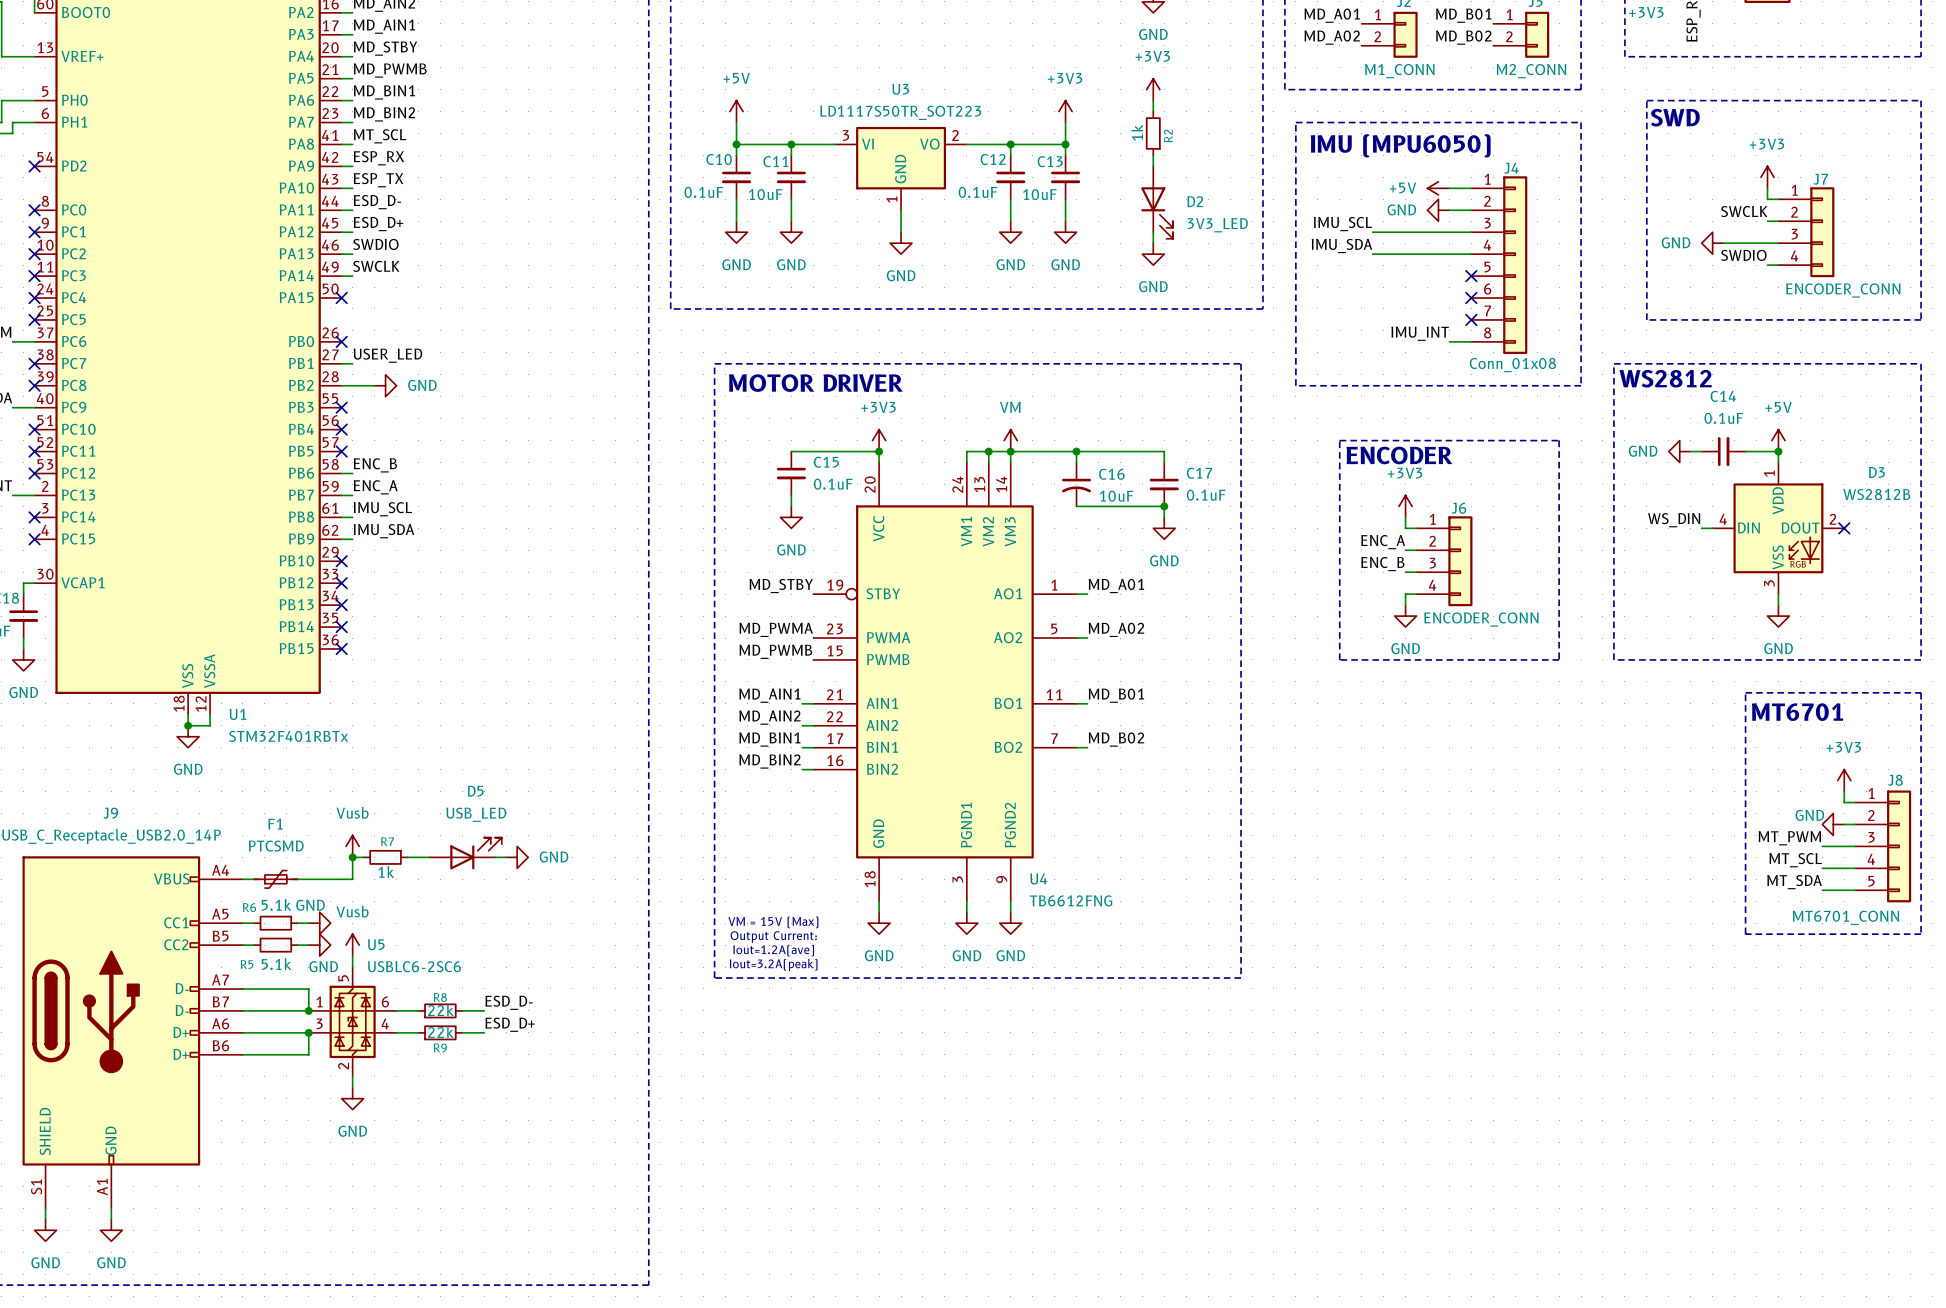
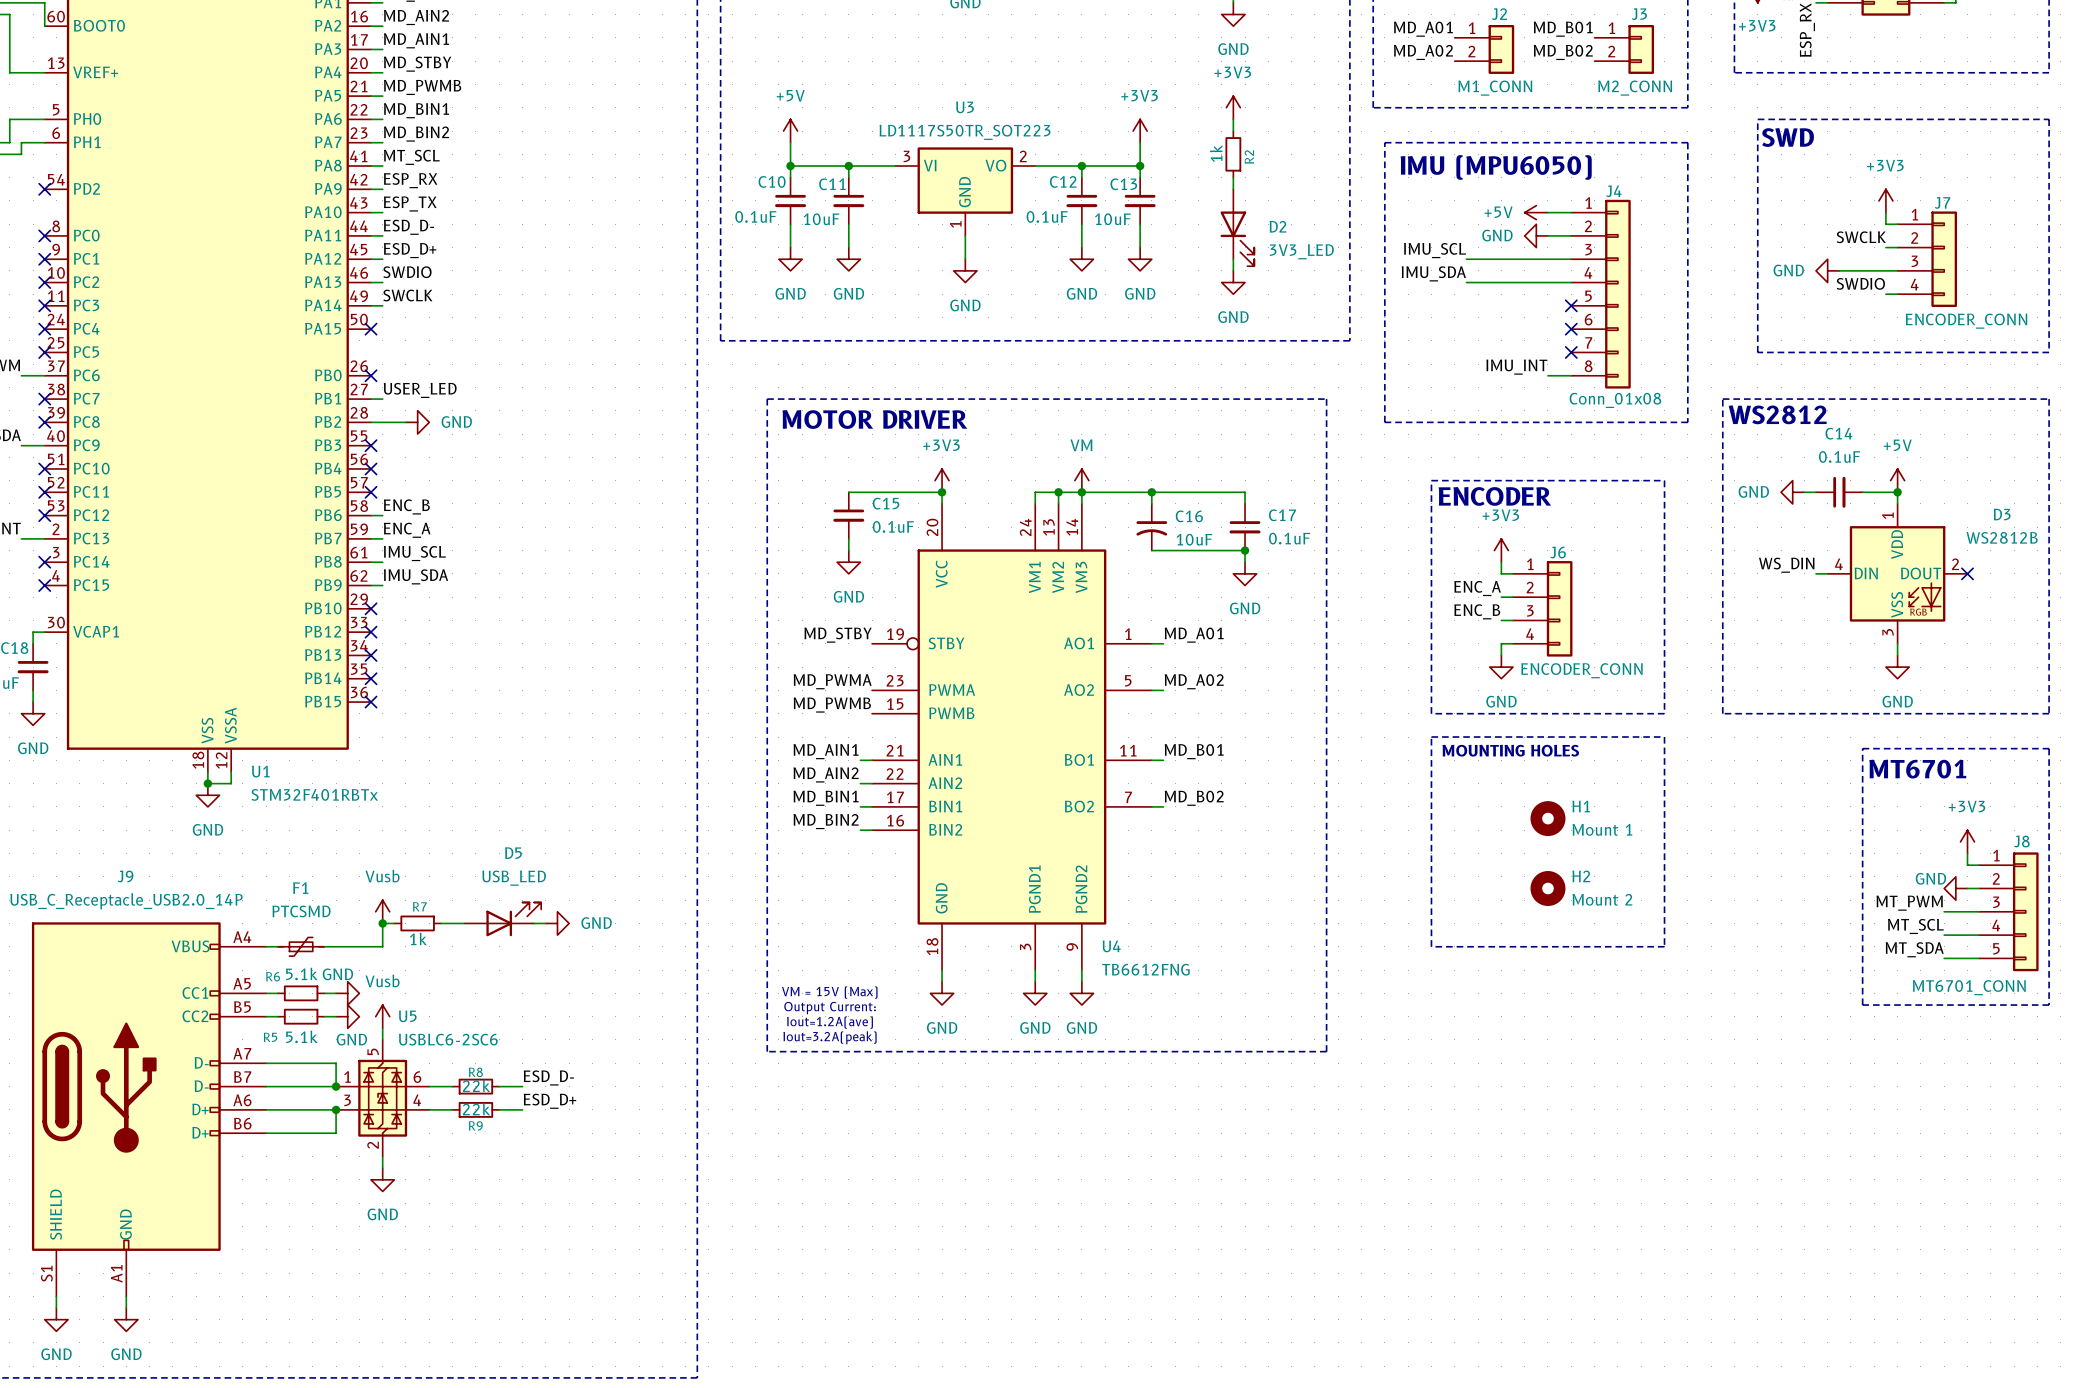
line: none -> (1431, 737) (1664, 737) (1664, 946) (1431, 946) (1431, 737)
text: none -> MOUNTING HOLES (1510, 750)
H1: none -> Mount 1 (1547, 818)
H2: none -> Mount 2 (1547, 888)

